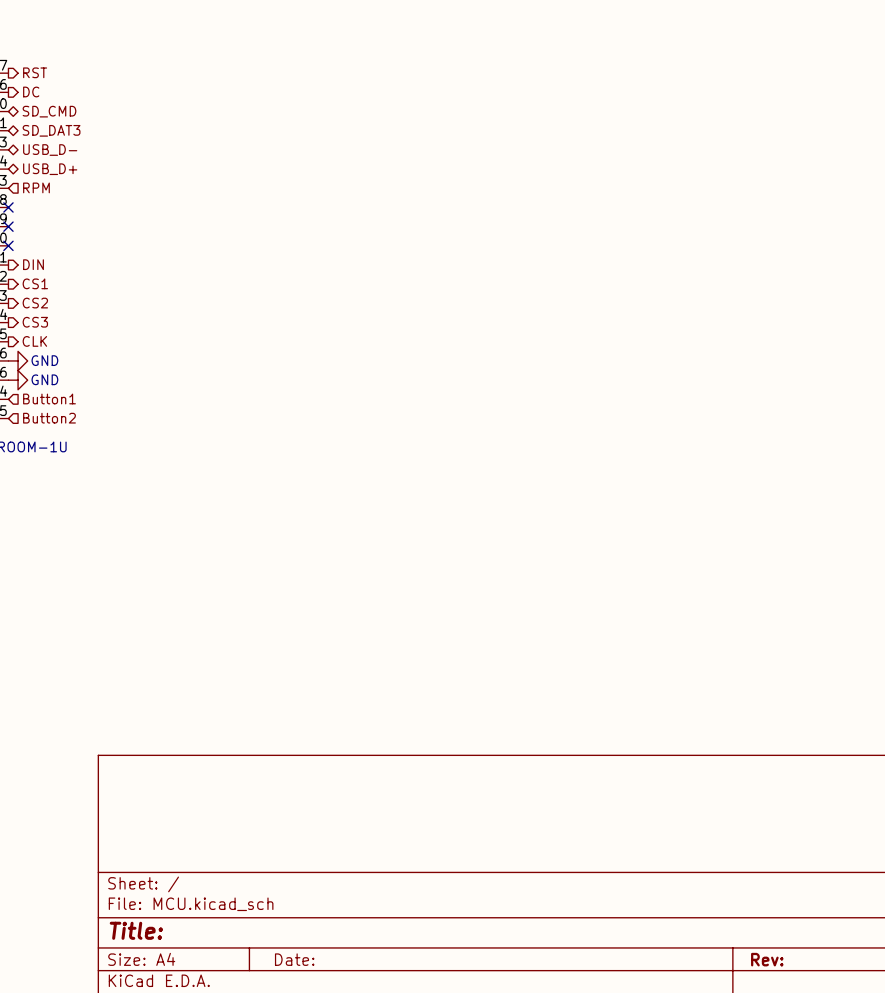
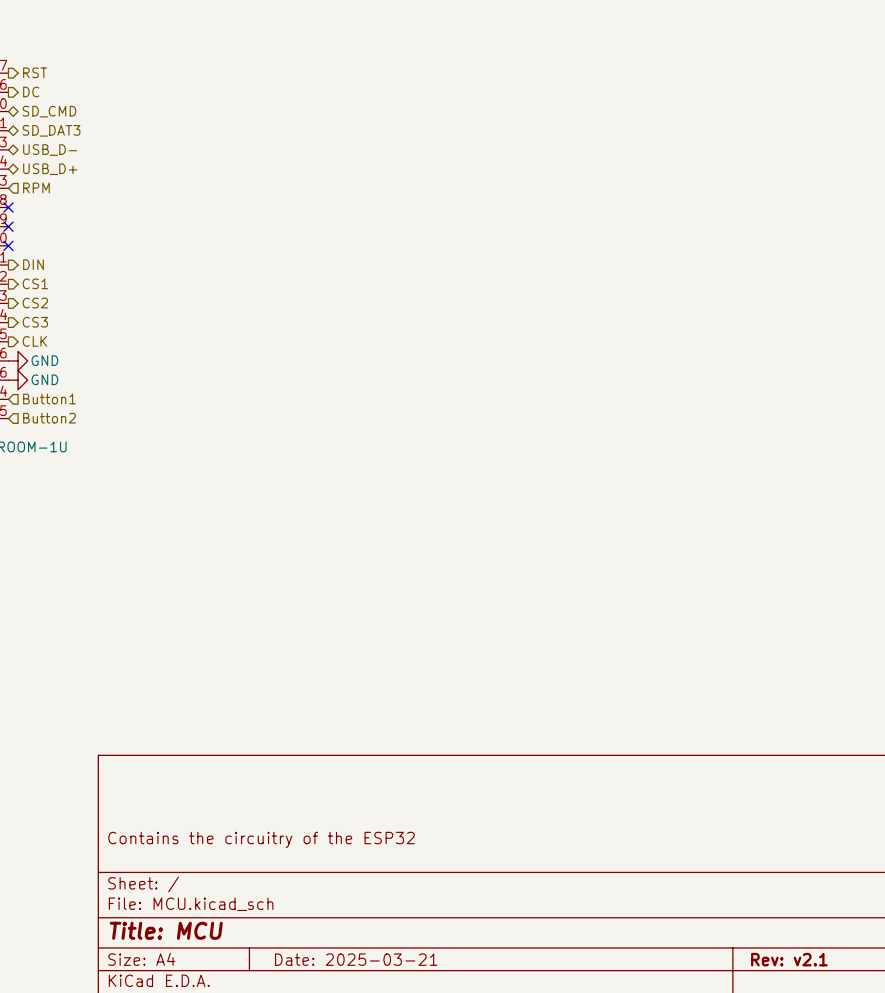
title block: none -> Contains the circuitry of the ESP32 (261, 839)
title block: Title: (136, 930) -> Title: MCU (166, 930)
title block: Date: (294, 959) -> Date: 2025-03-21 (356, 959)
title block: Rev: (767, 959) -> Rev: v2.1 (789, 959)

